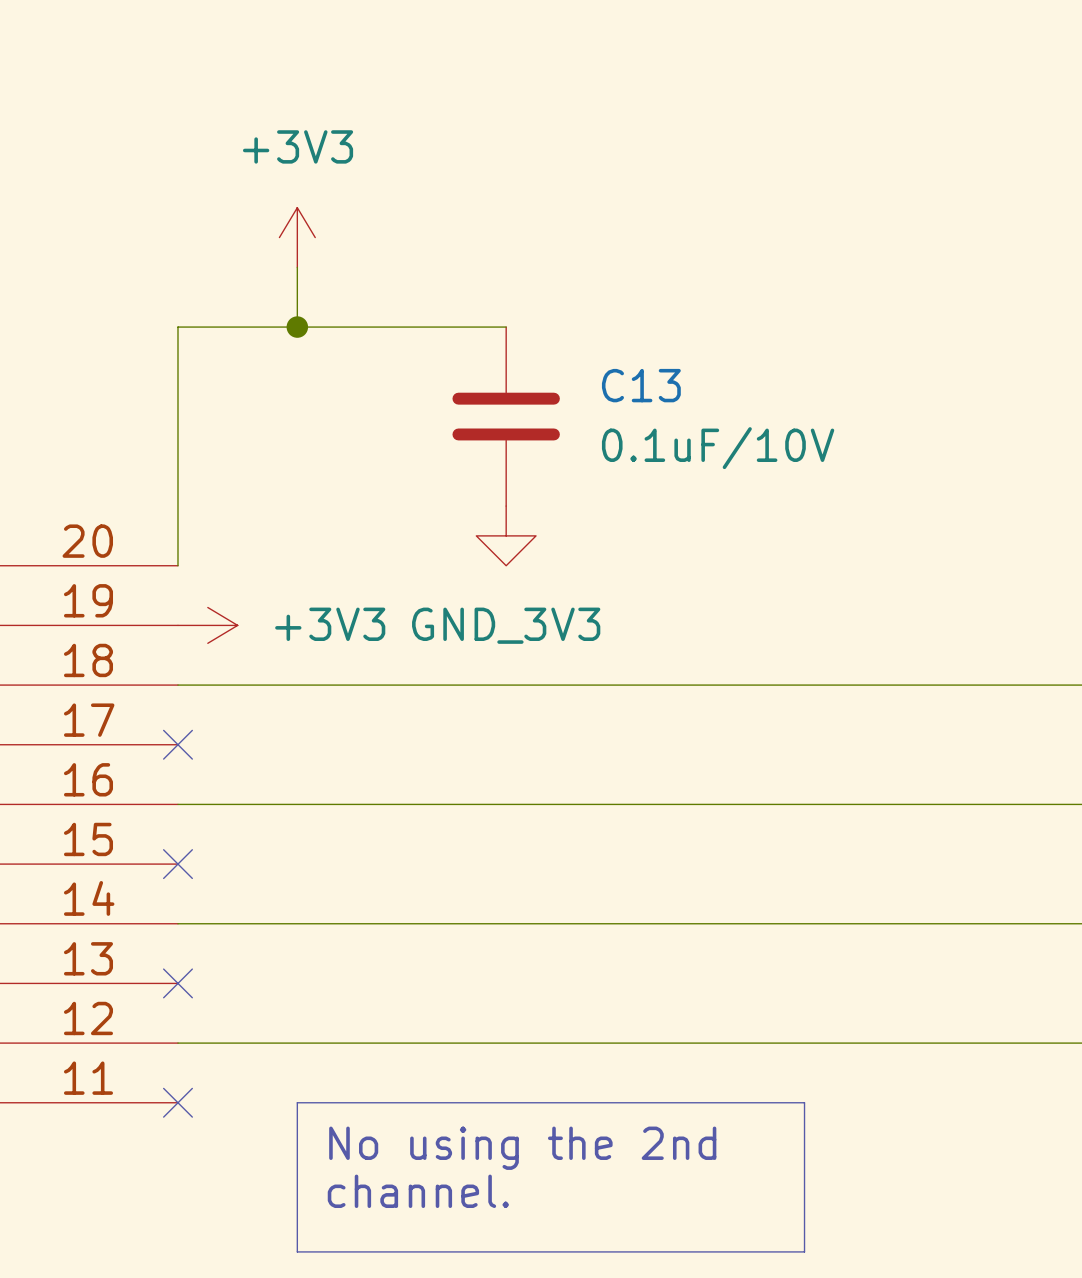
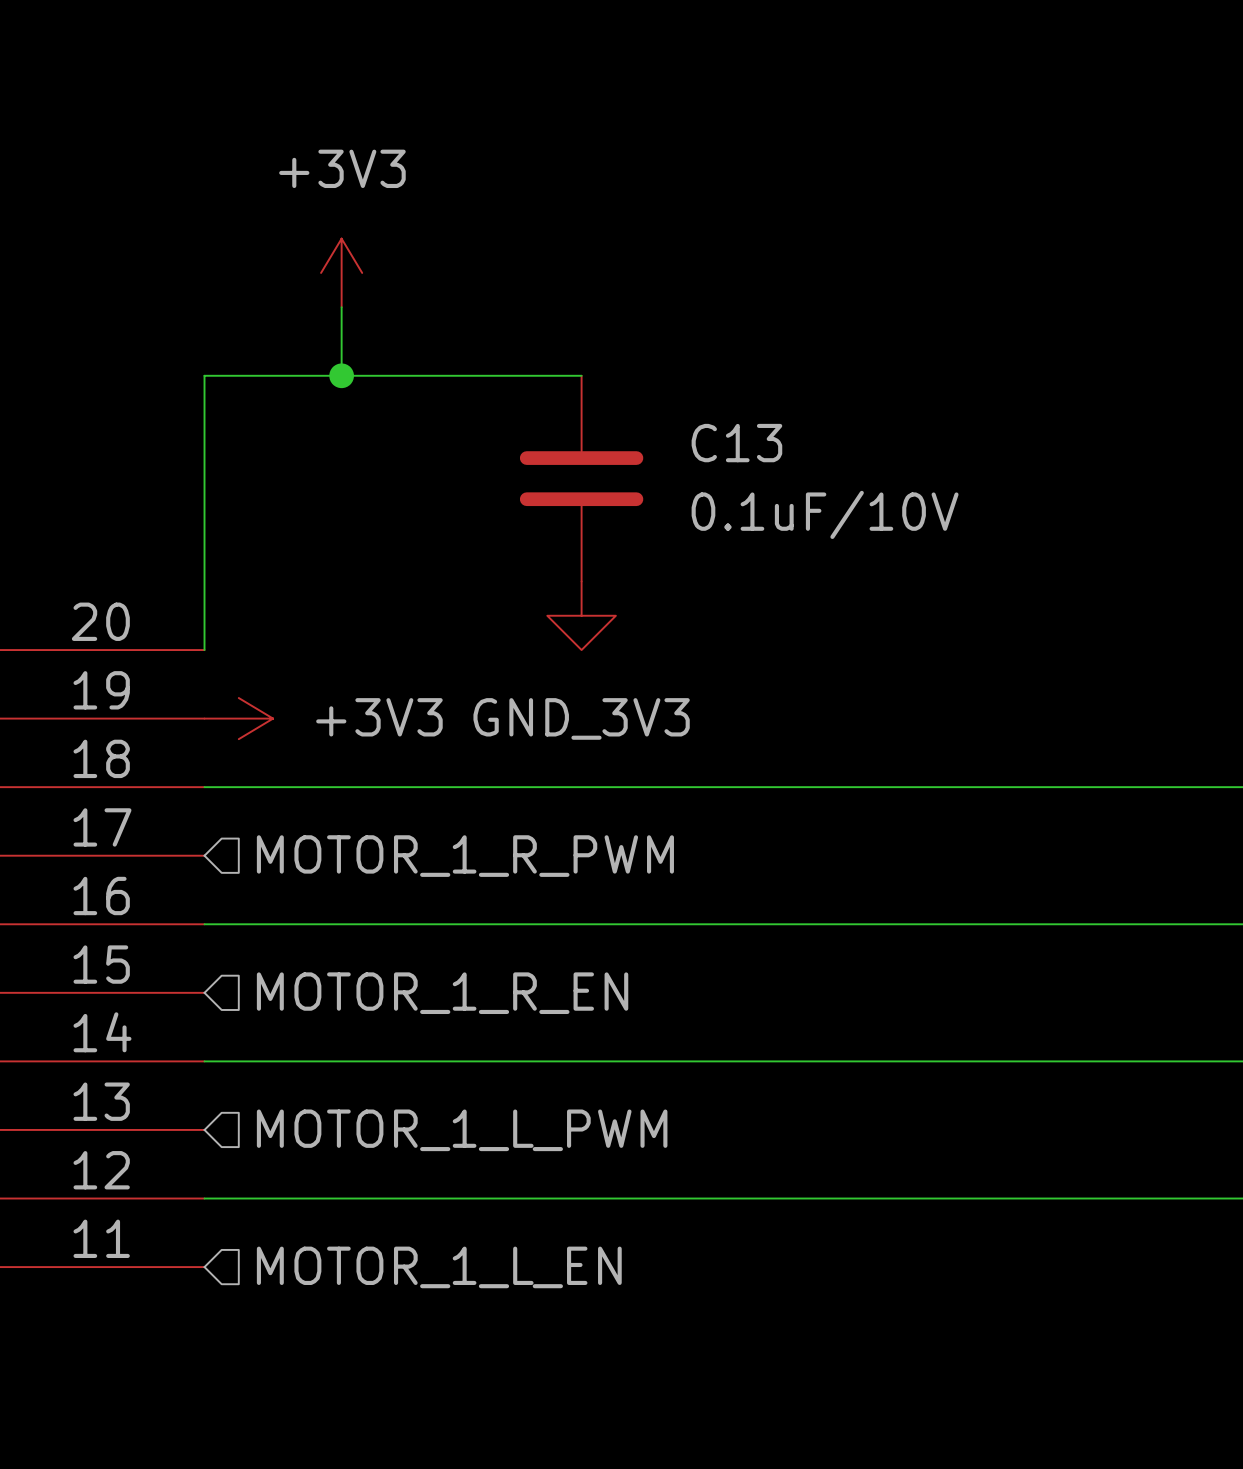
no-connect mark: (177, 744) -> none
hierarchical label: none -> MOTOR_1_R_PWM (465, 856)
no-connect mark: (177, 864) -> none
hierarchical label: none -> MOTOR_1_R_EN (442, 993)
no-connect mark: (177, 983) -> none
hierarchical label: none -> MOTOR_1_L_PWM (462, 1130)
no-connect mark: (177, 1102) -> none
line: (297, 1102) (804, 1102) (804, 1251) (297, 1251) (297, 1102) -> none
hierarchical label: none -> MOTOR_1_L_EN (439, 1267)
text: No using the 2nd (522, 1148) -> none
text: channel. (418, 1191) -> none

